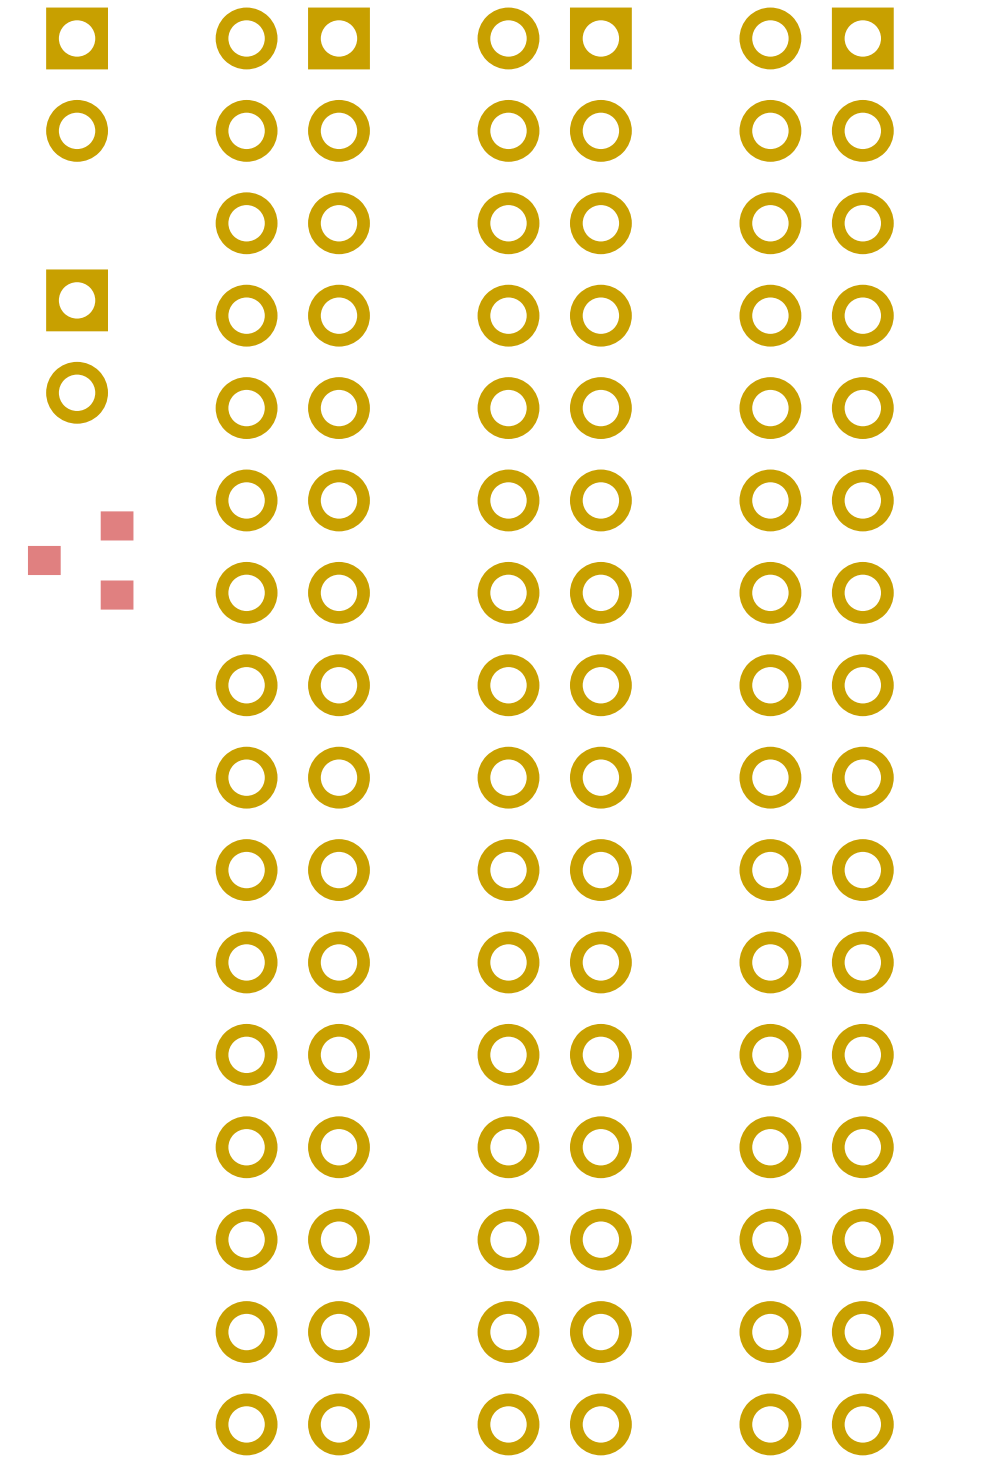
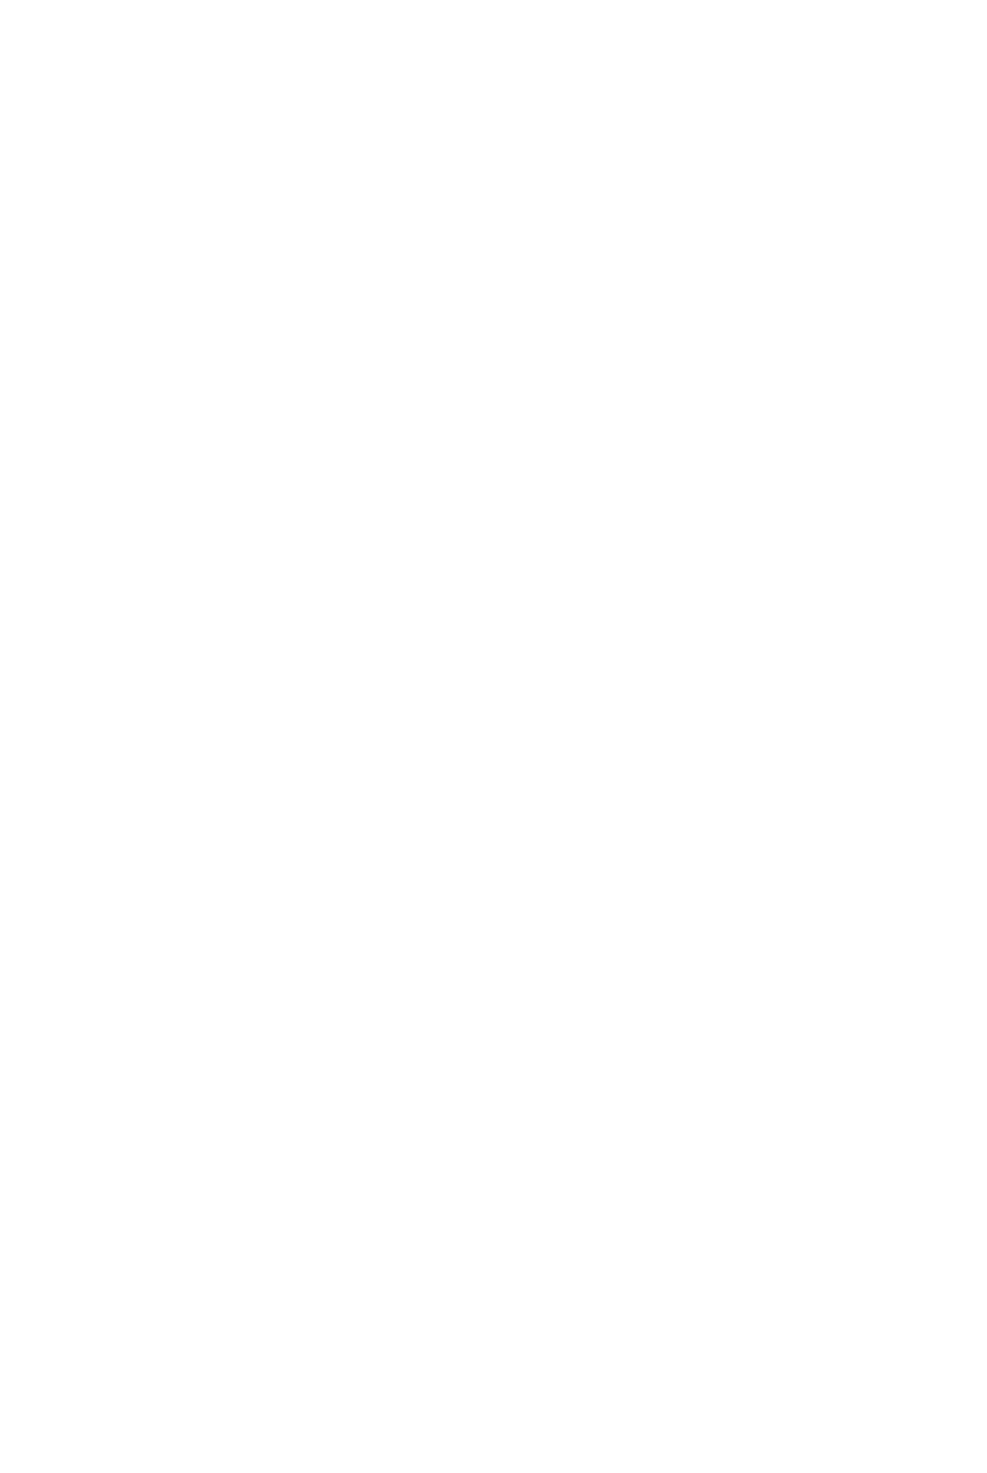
part: (77, 84) -> none
part: (77, 346) -> none
part: (80, 560) -> none
part: (292, 731) -> none
part: (554, 731) -> none
part: (816, 731) -> none

